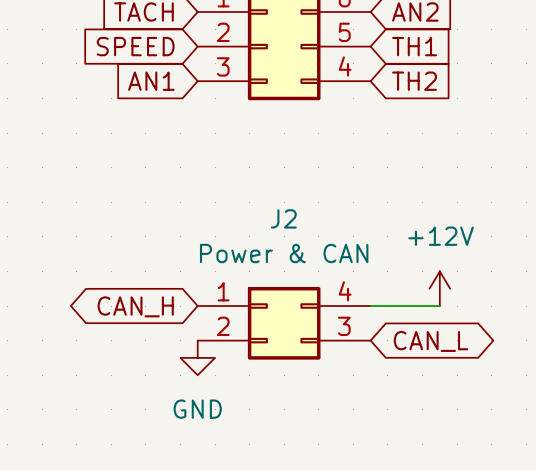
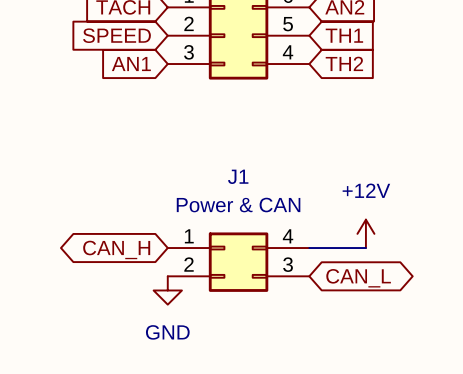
J2 name: J2 (283, 218) -> J1 (238, 176)

